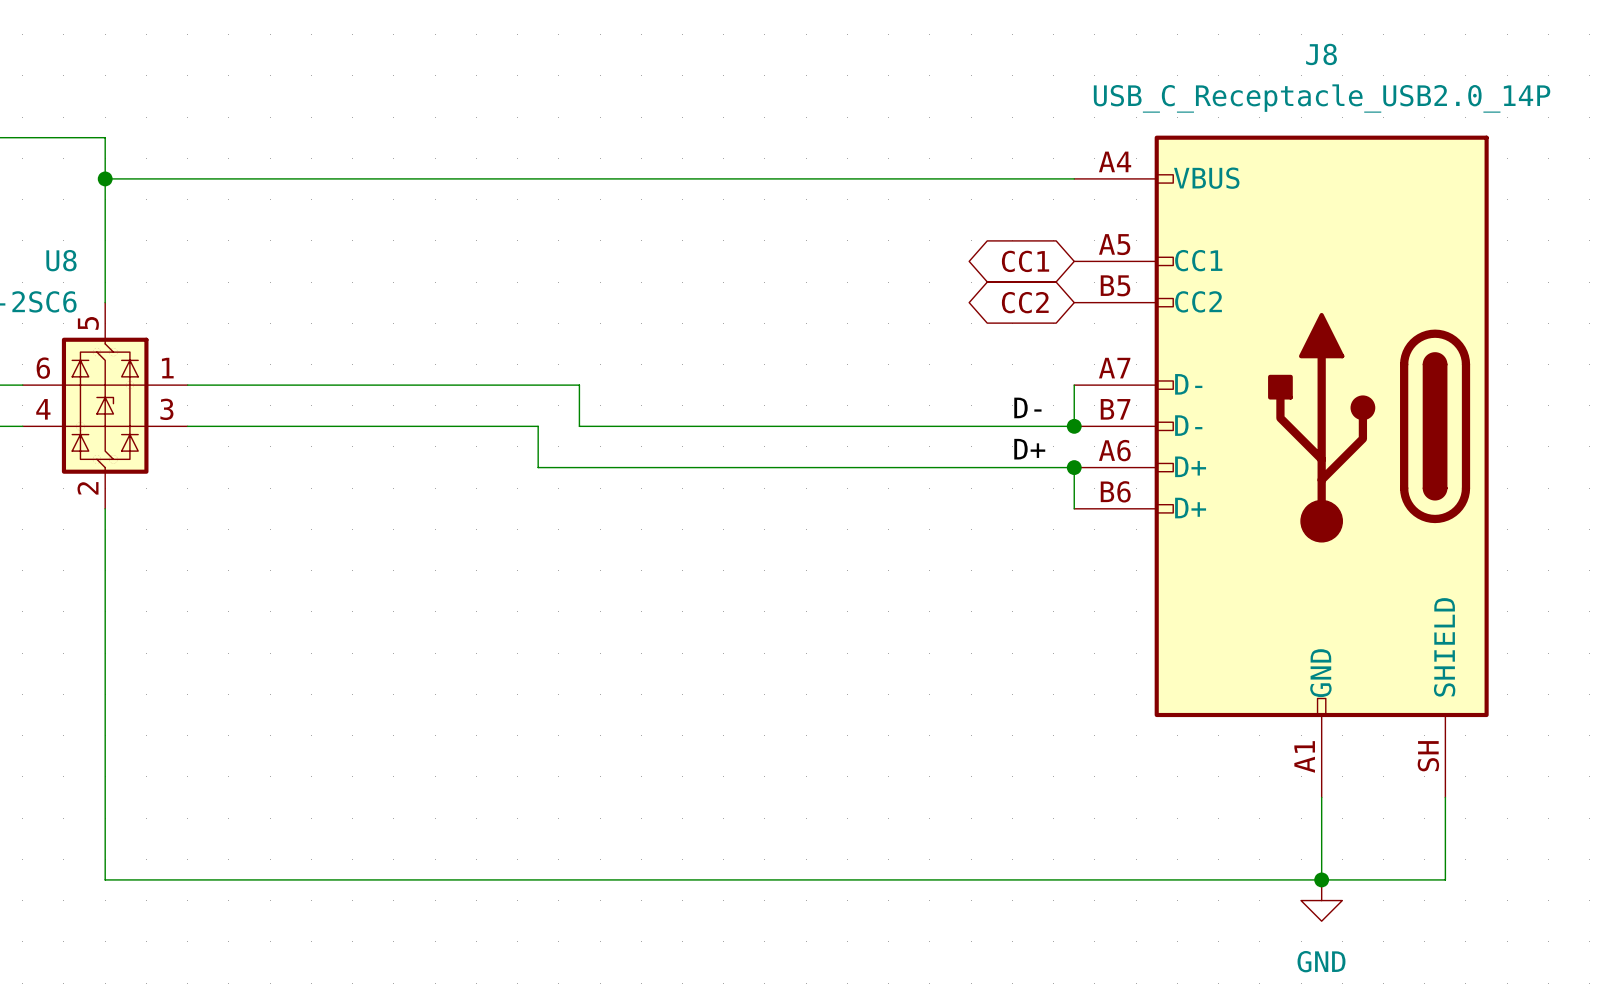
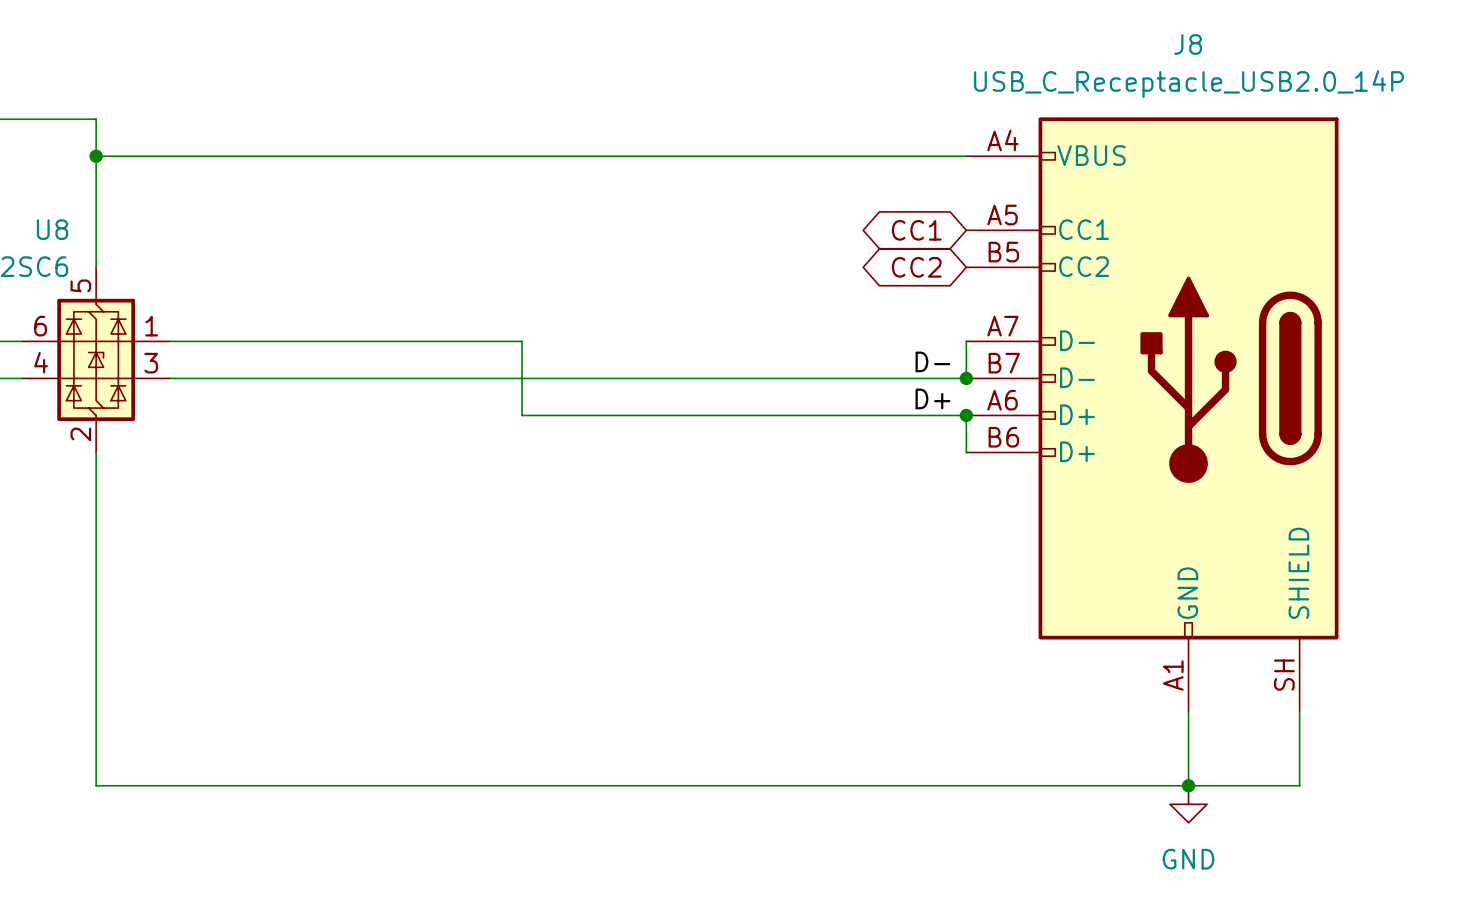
wire: (538, 426) (538, 467) (579, 467) -> (484, 378) (521, 378) (521, 415)

